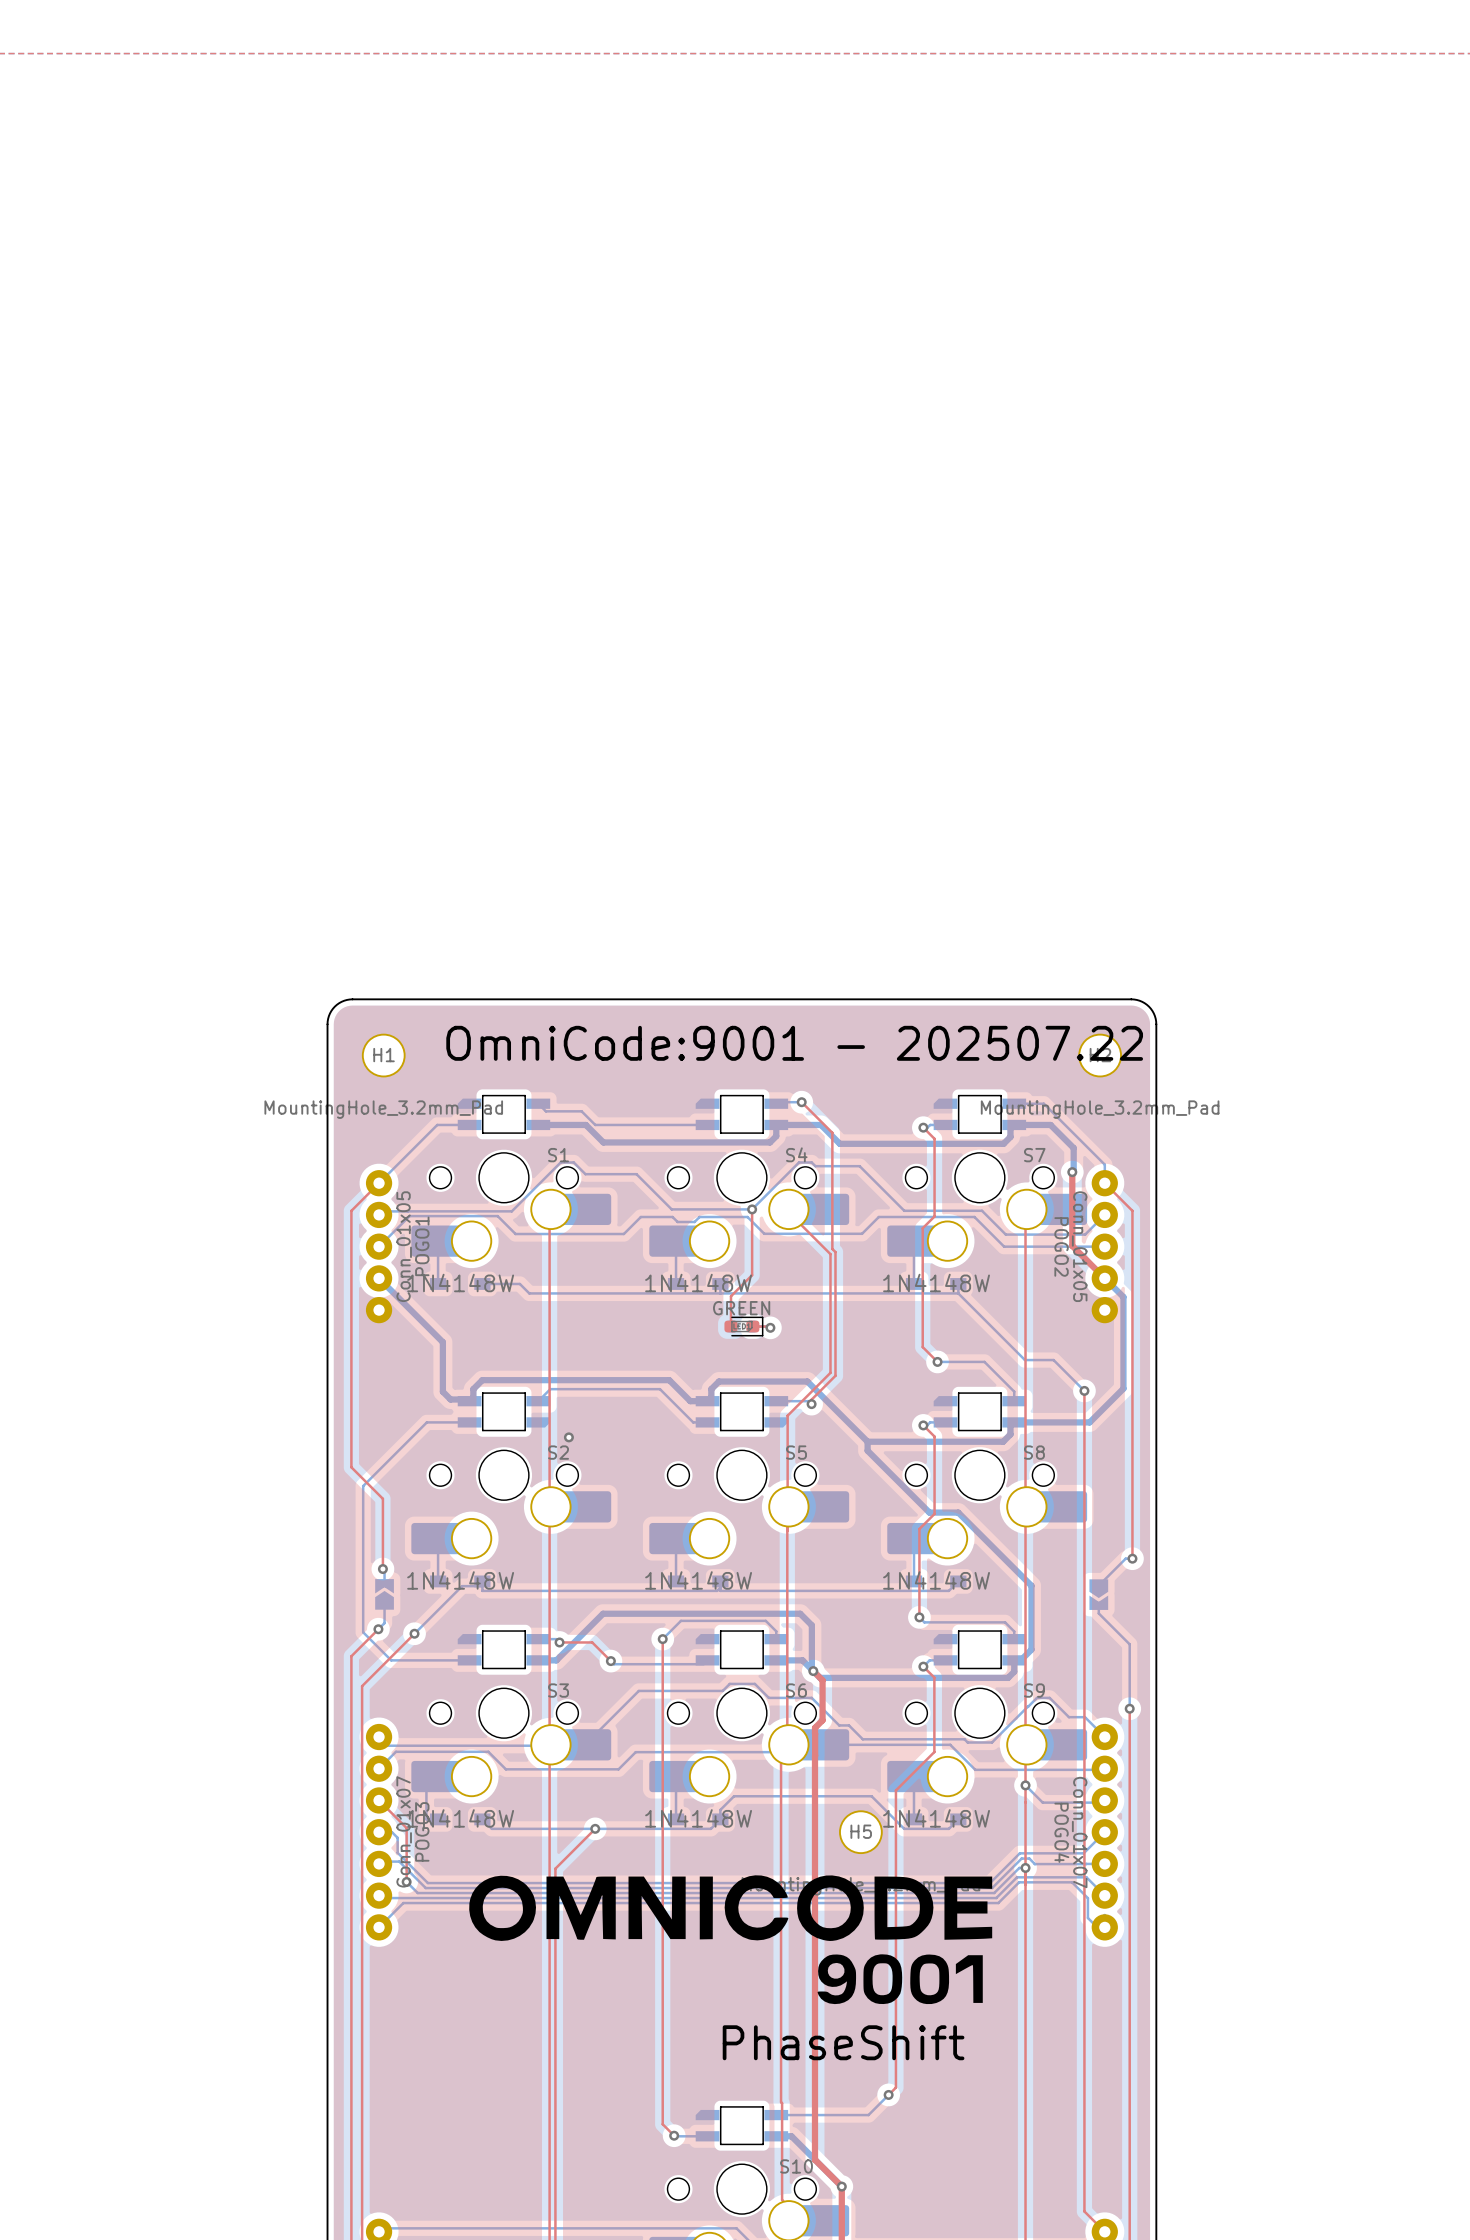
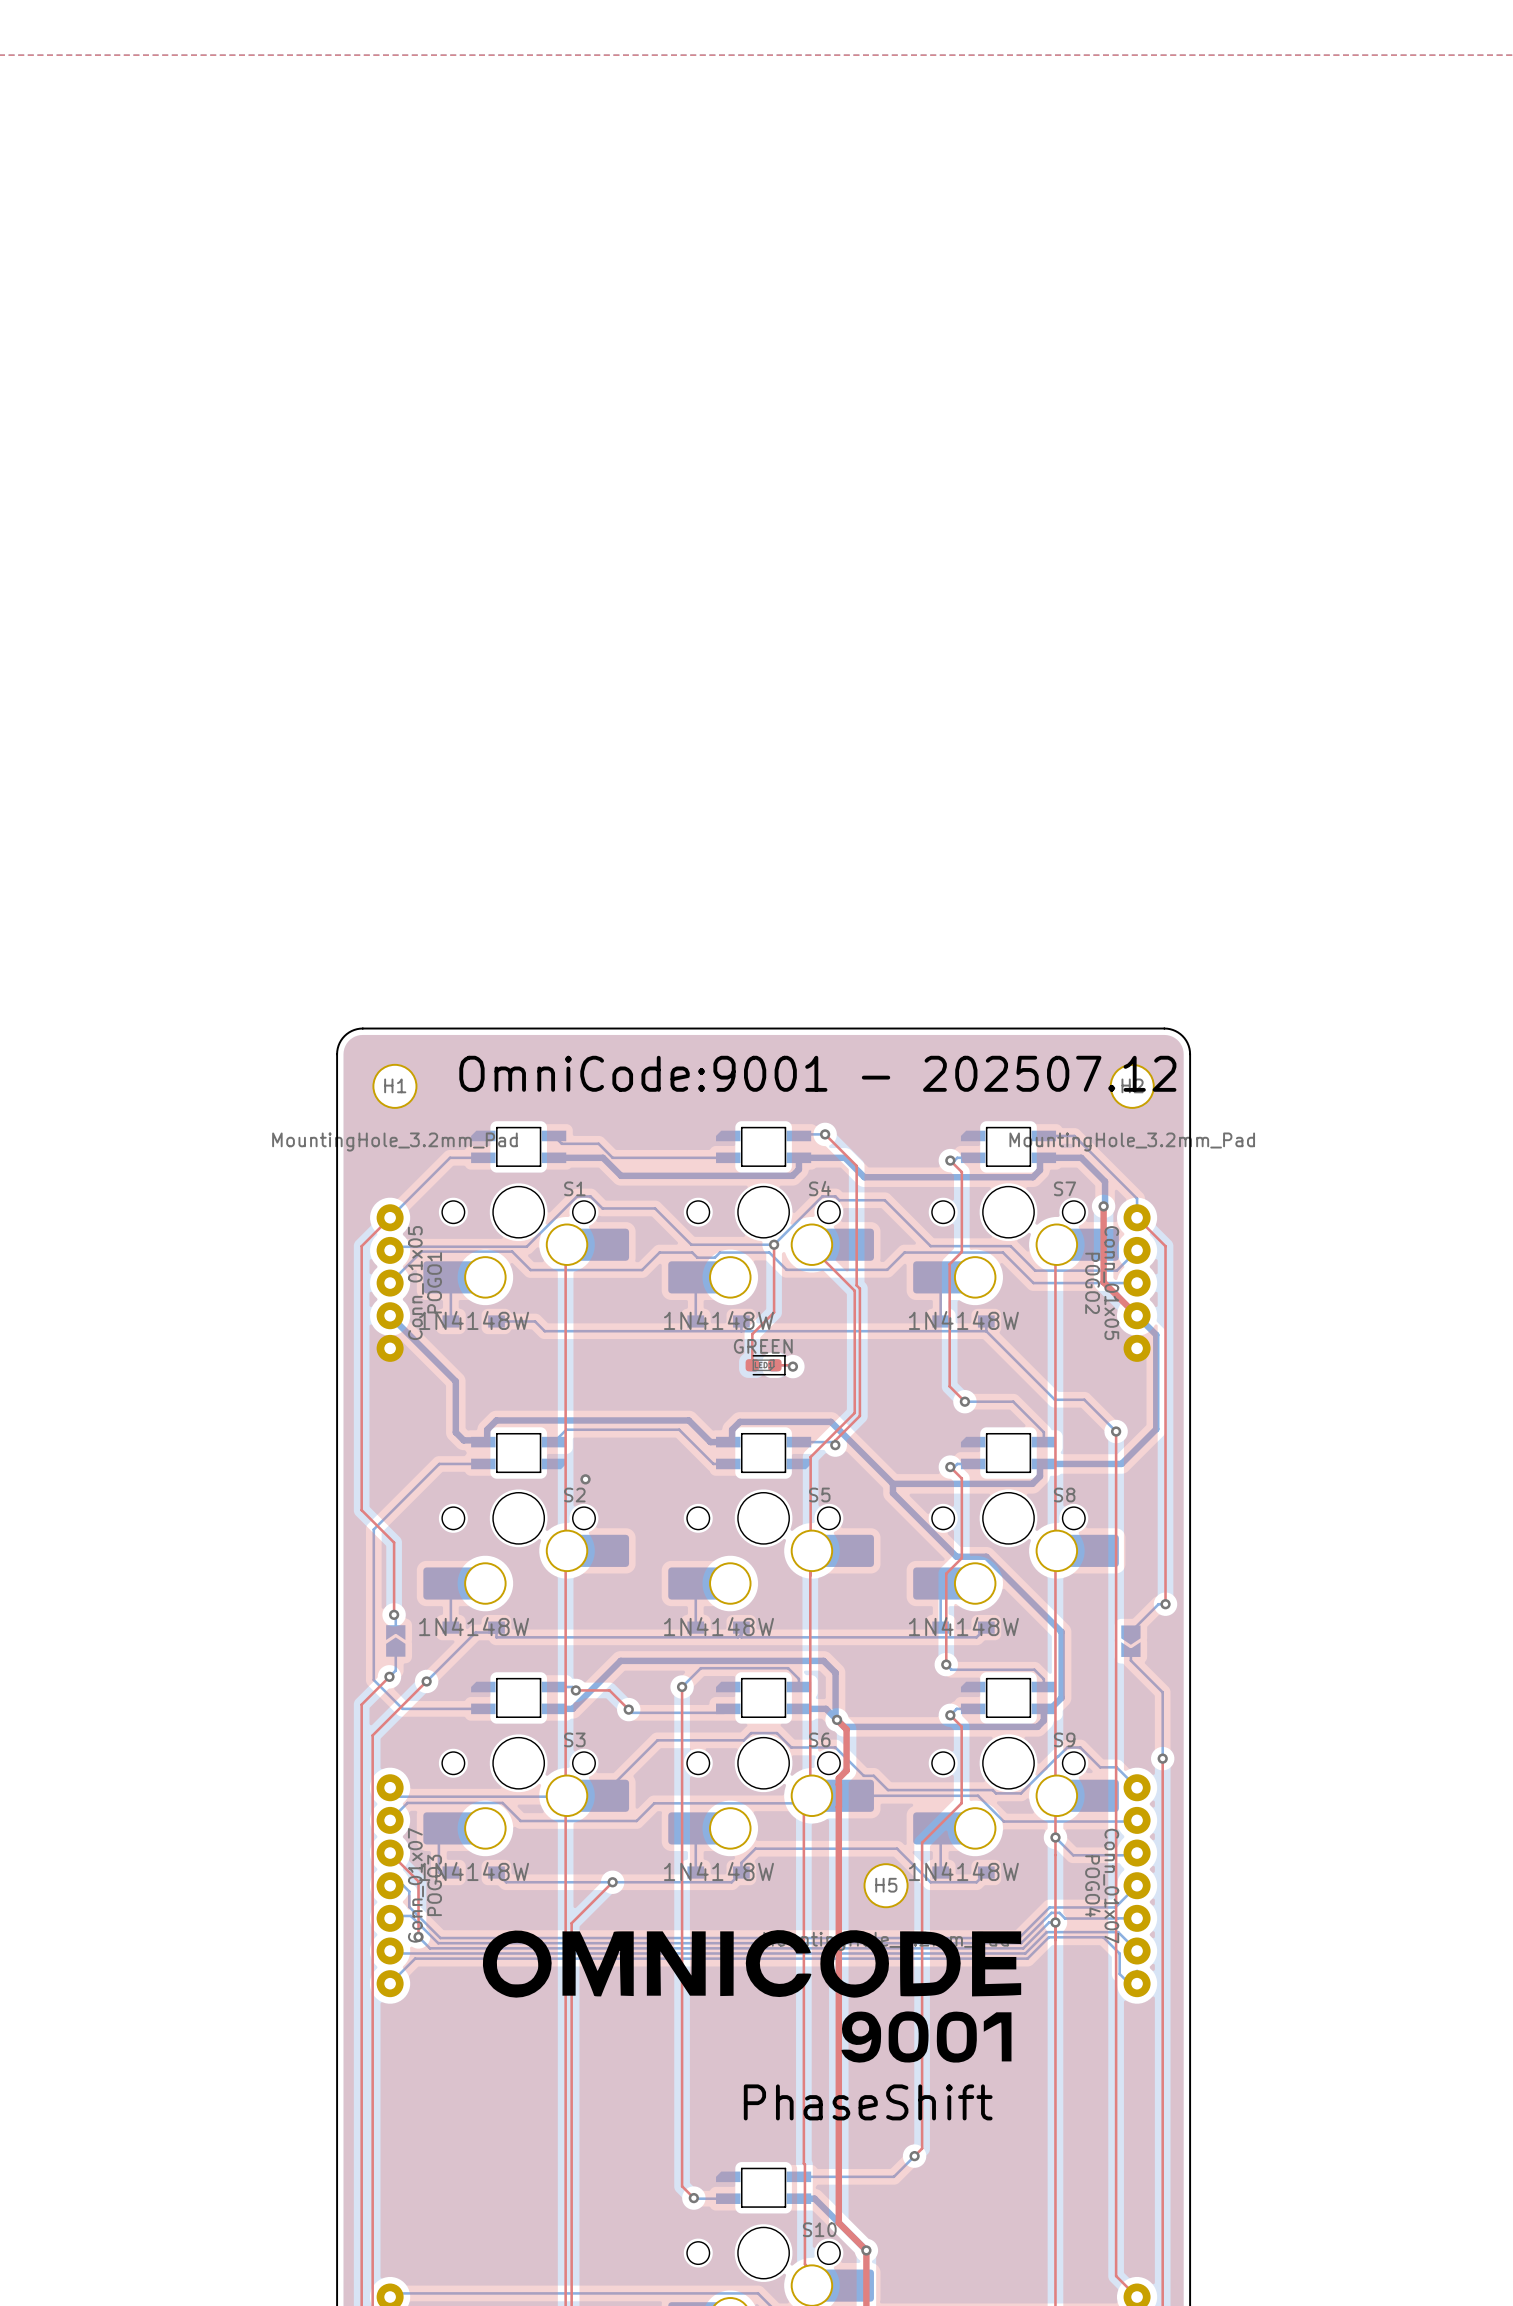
text: OmniCode:9001 - 202507.22 (794, 1043) -> OmniCode:9001 - 202507.12 (817, 1073)

